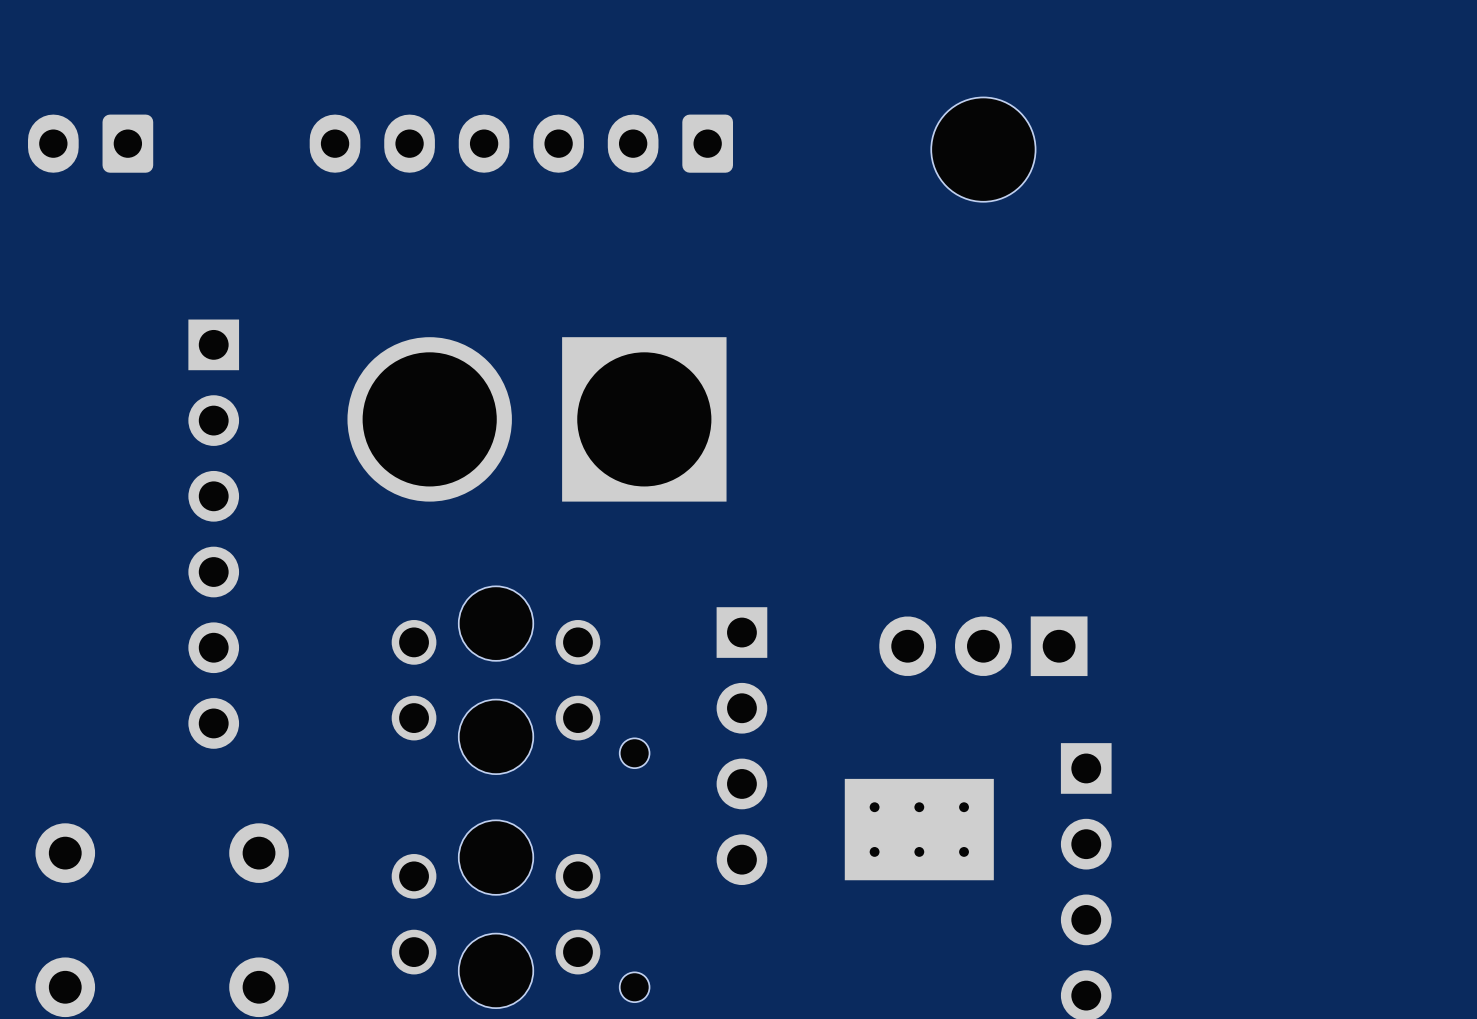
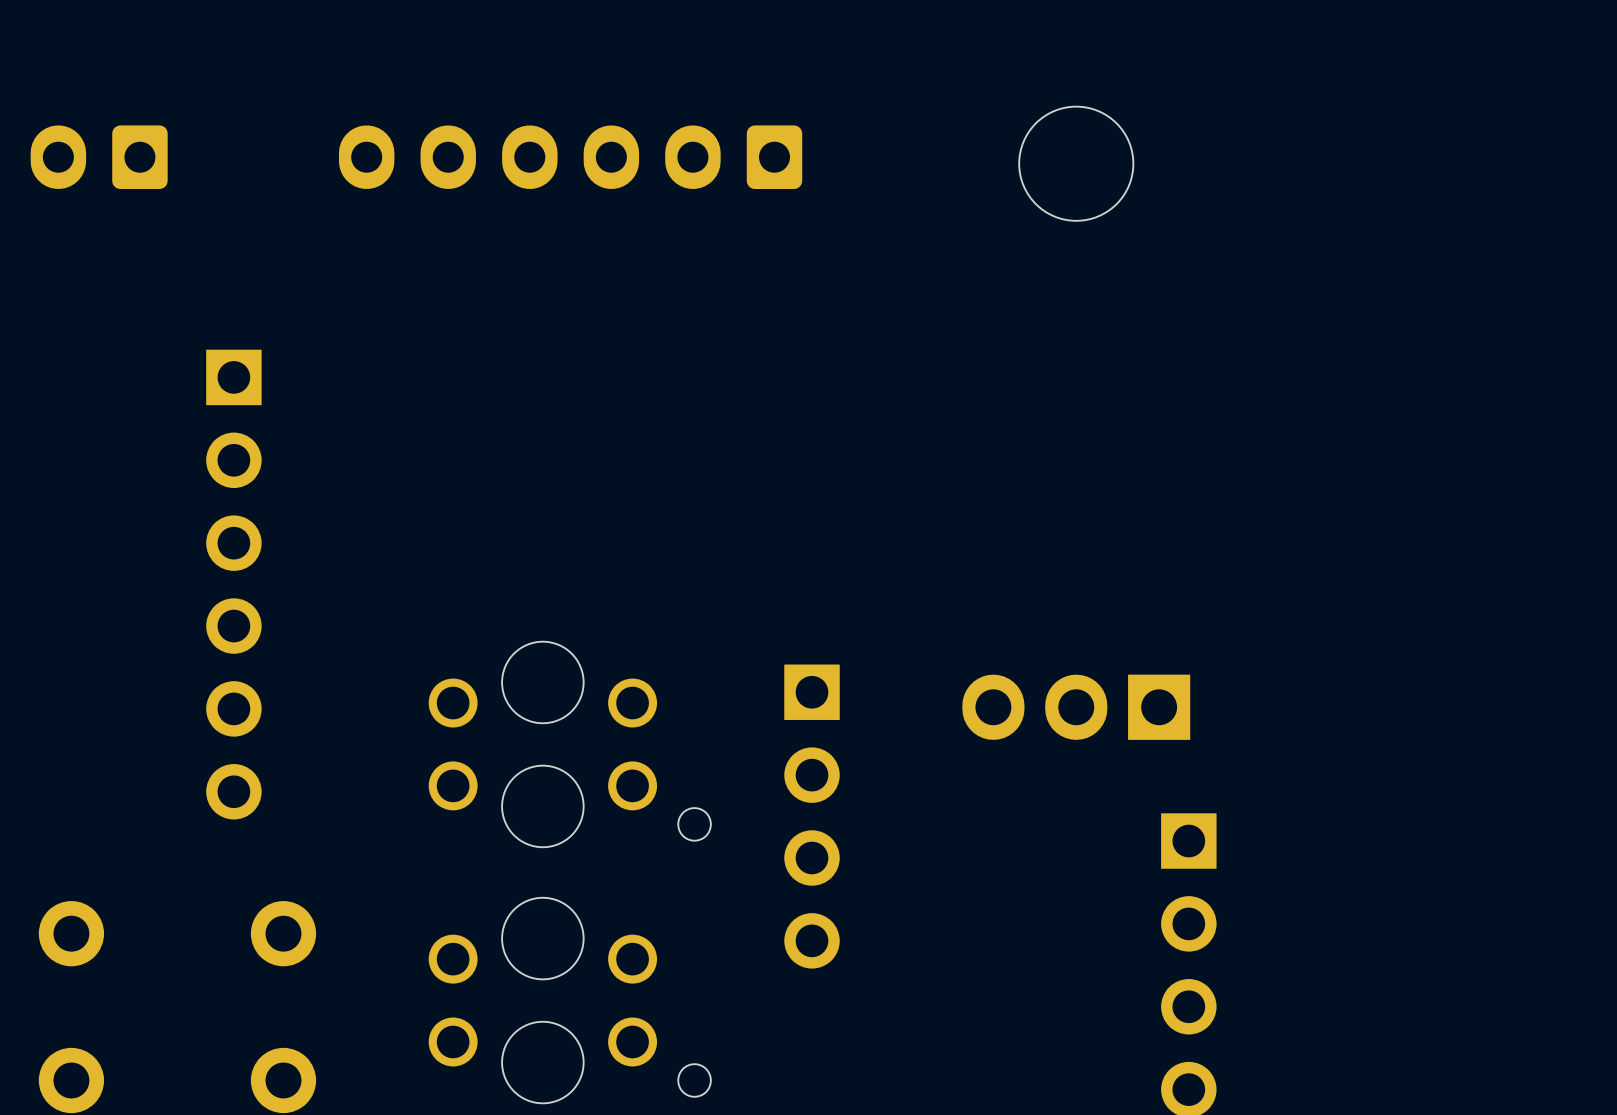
part: (537, 419) -> none
part: (919, 829) -> none

